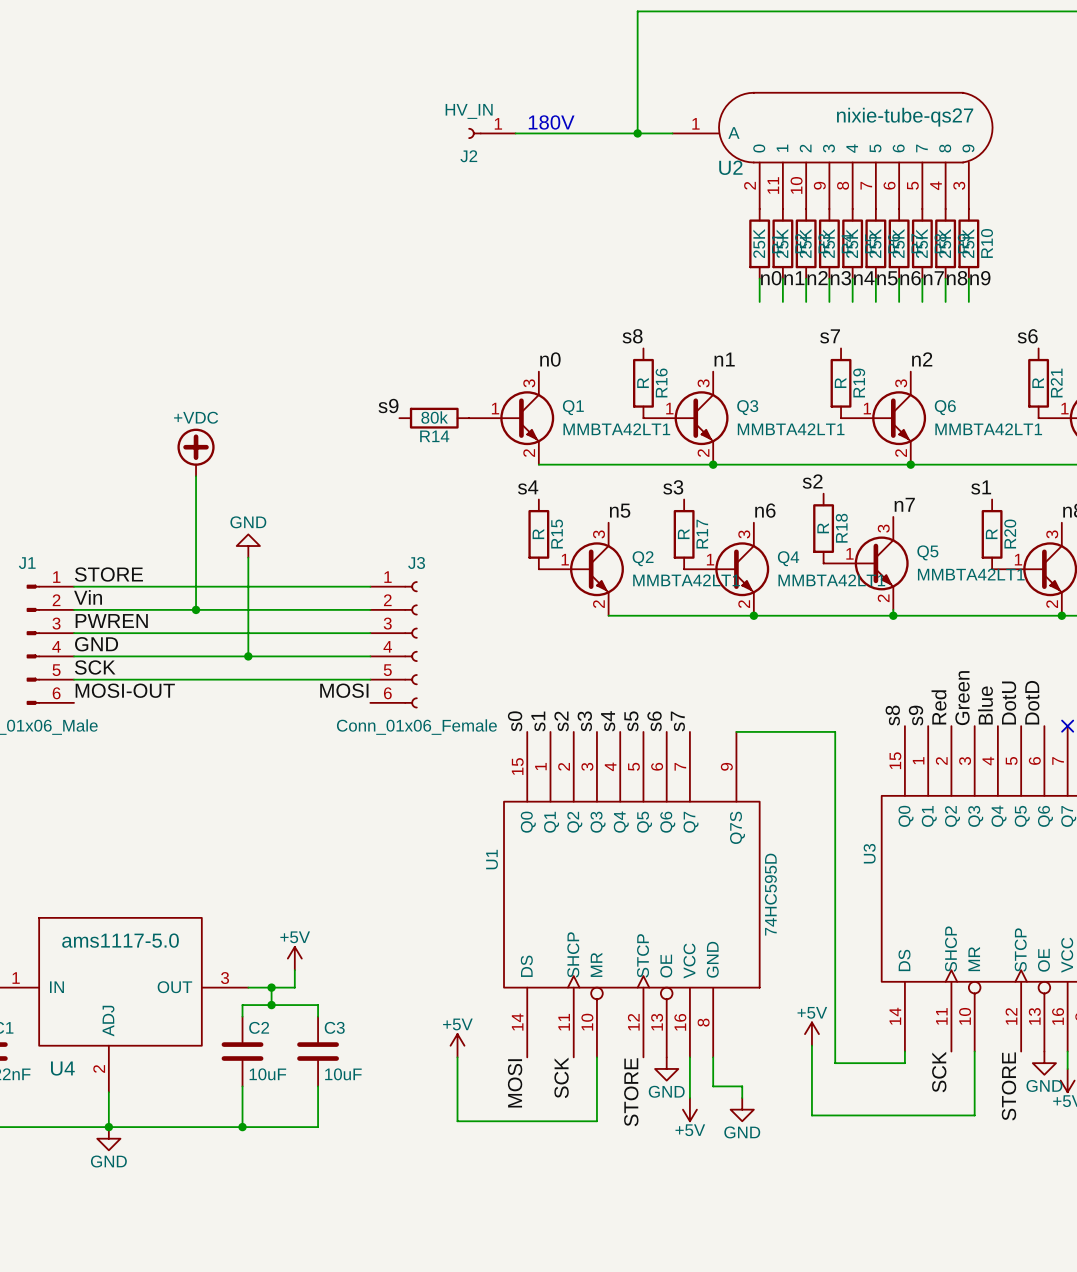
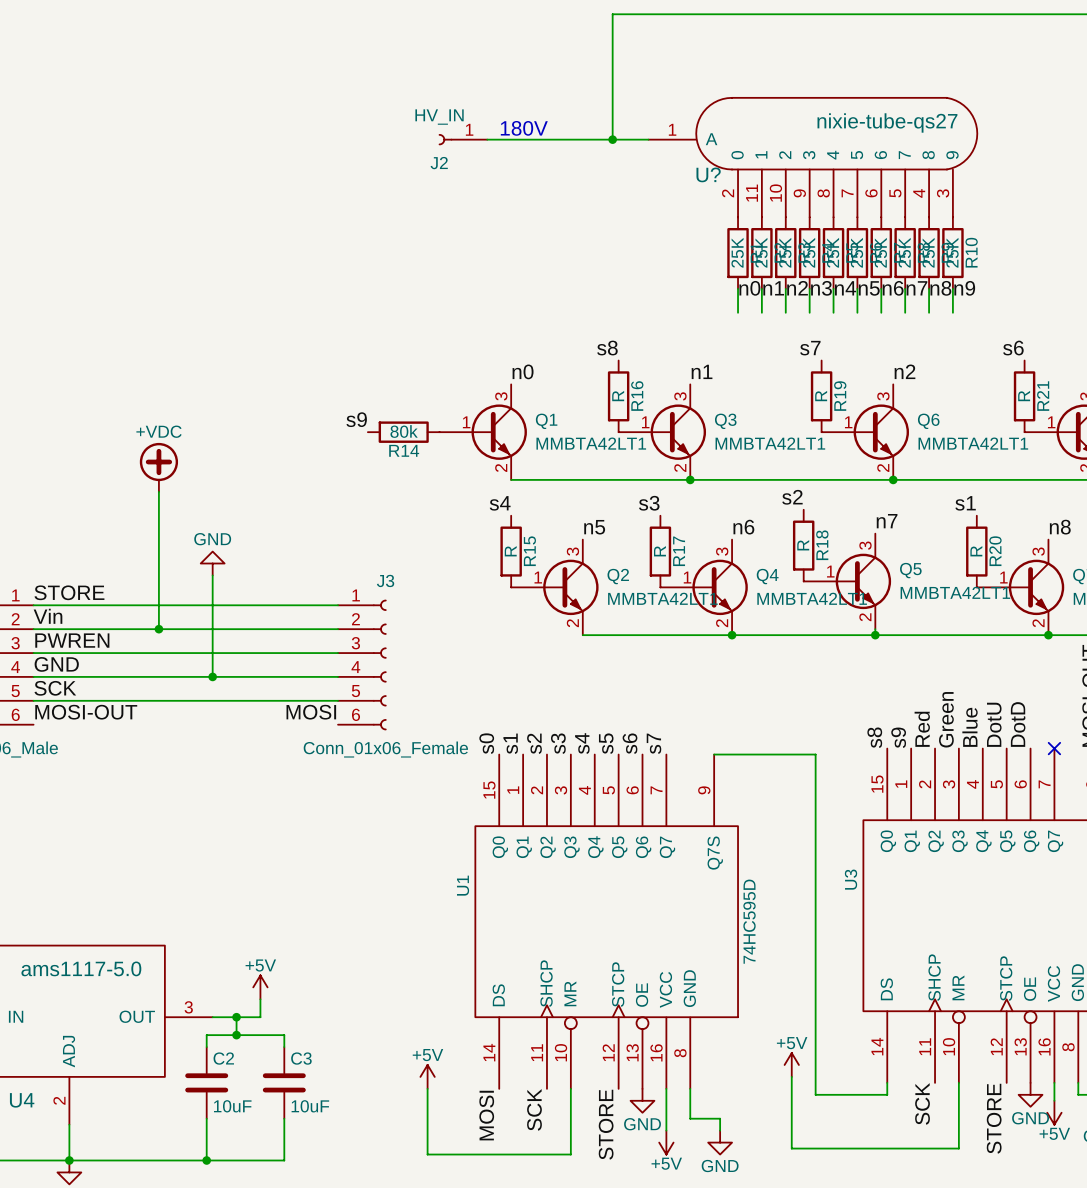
U2 name: U2 (730, 167) -> U? (708, 174)

